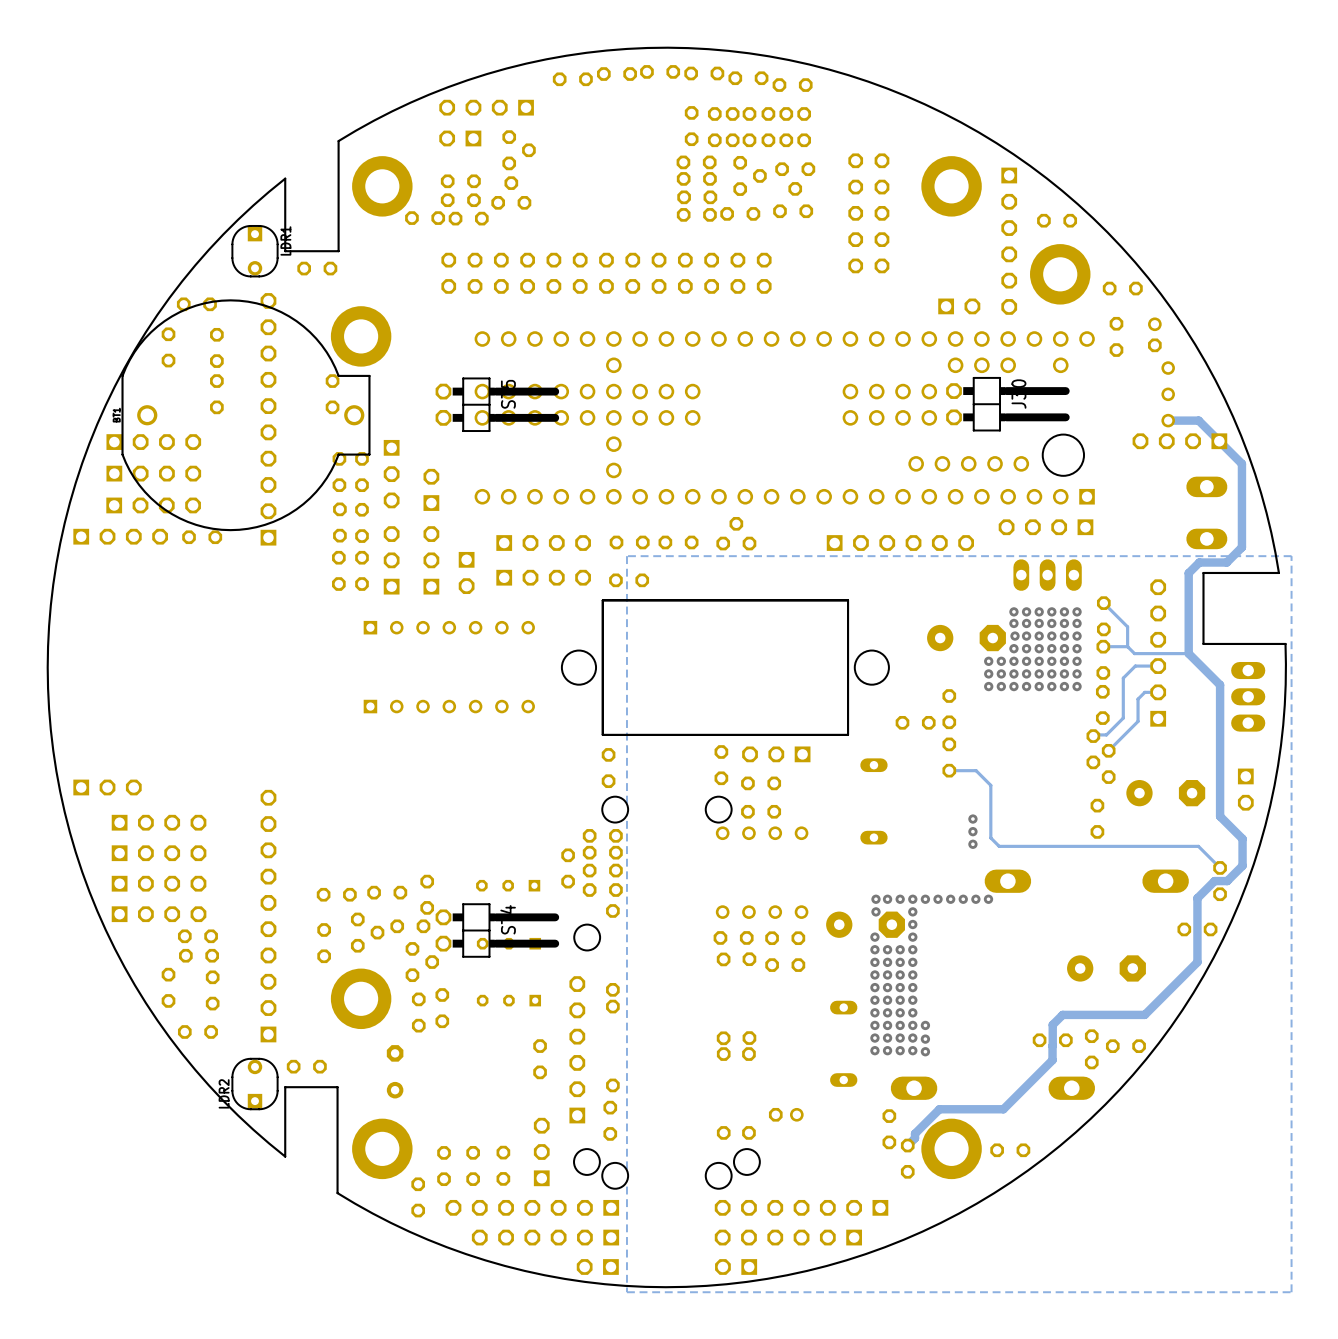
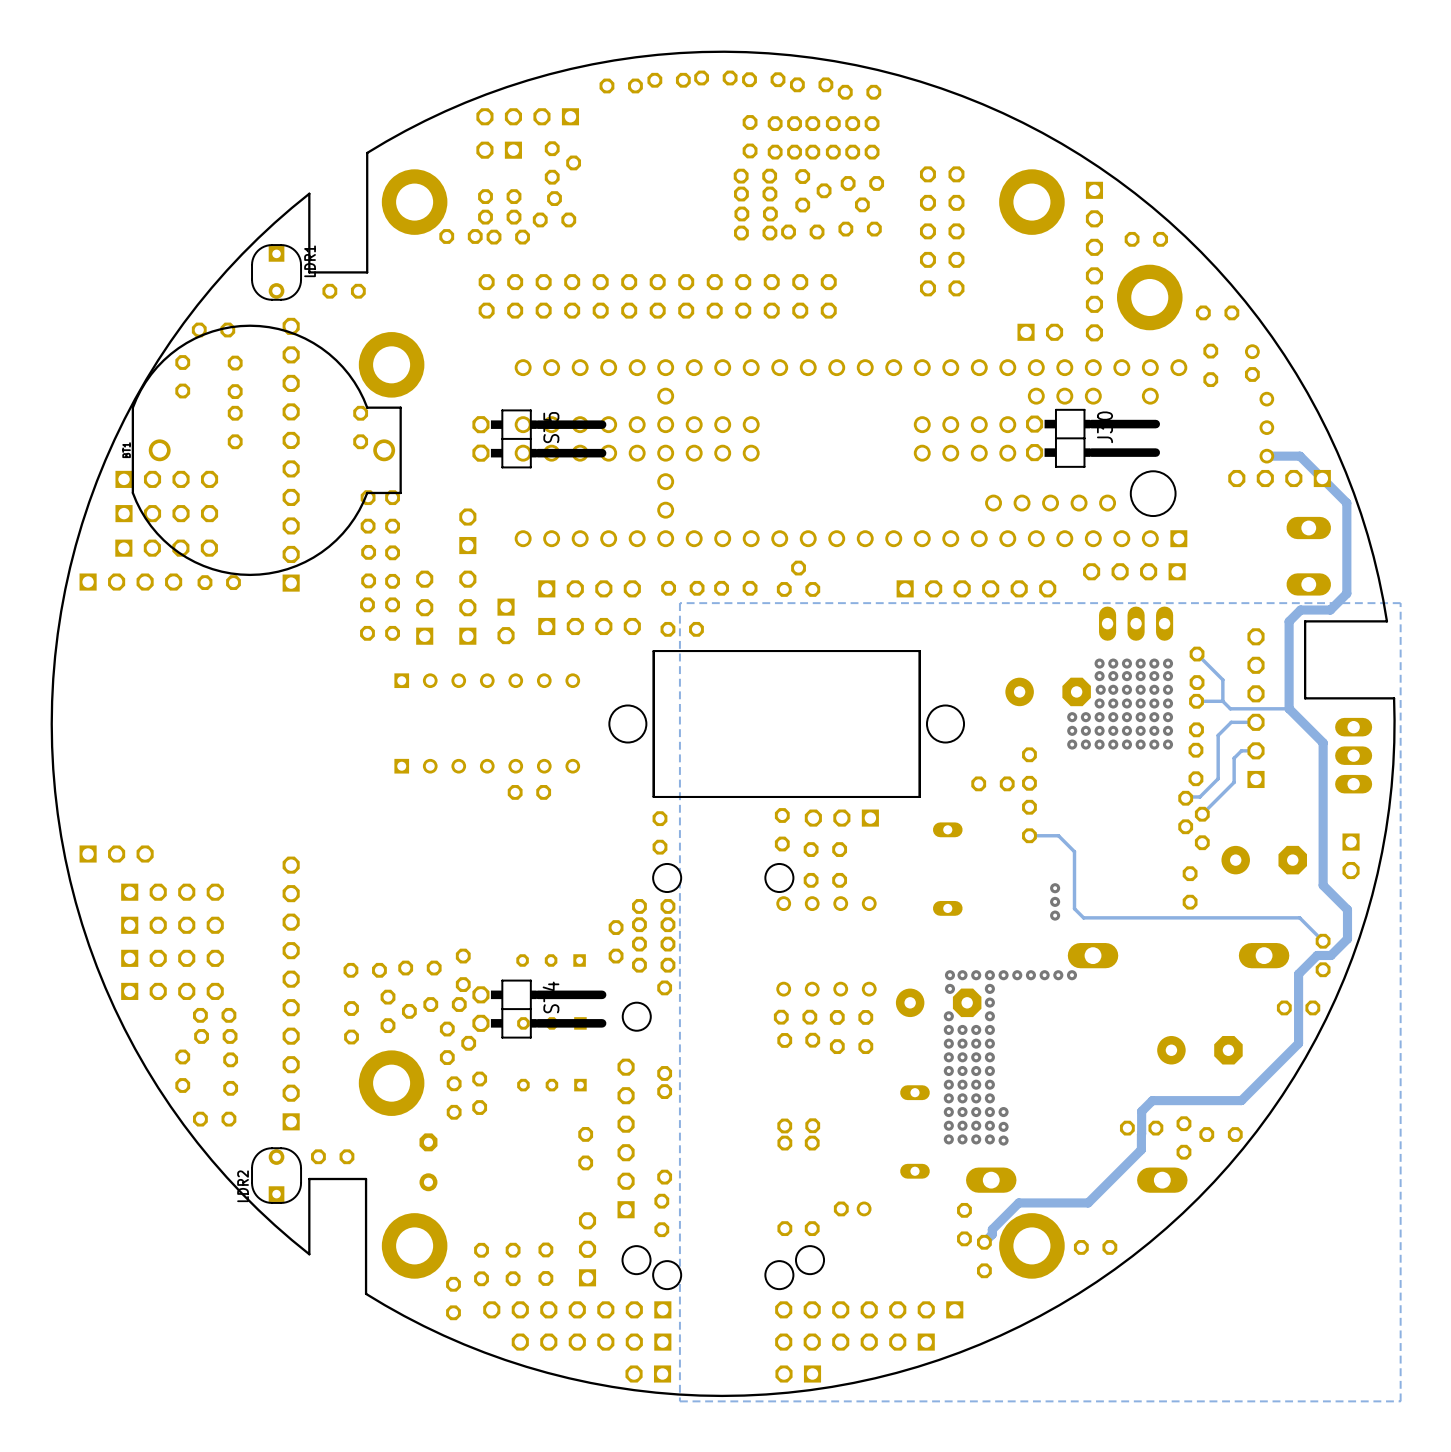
part: (391, 474) -> none
part: none -> (529, 792)

